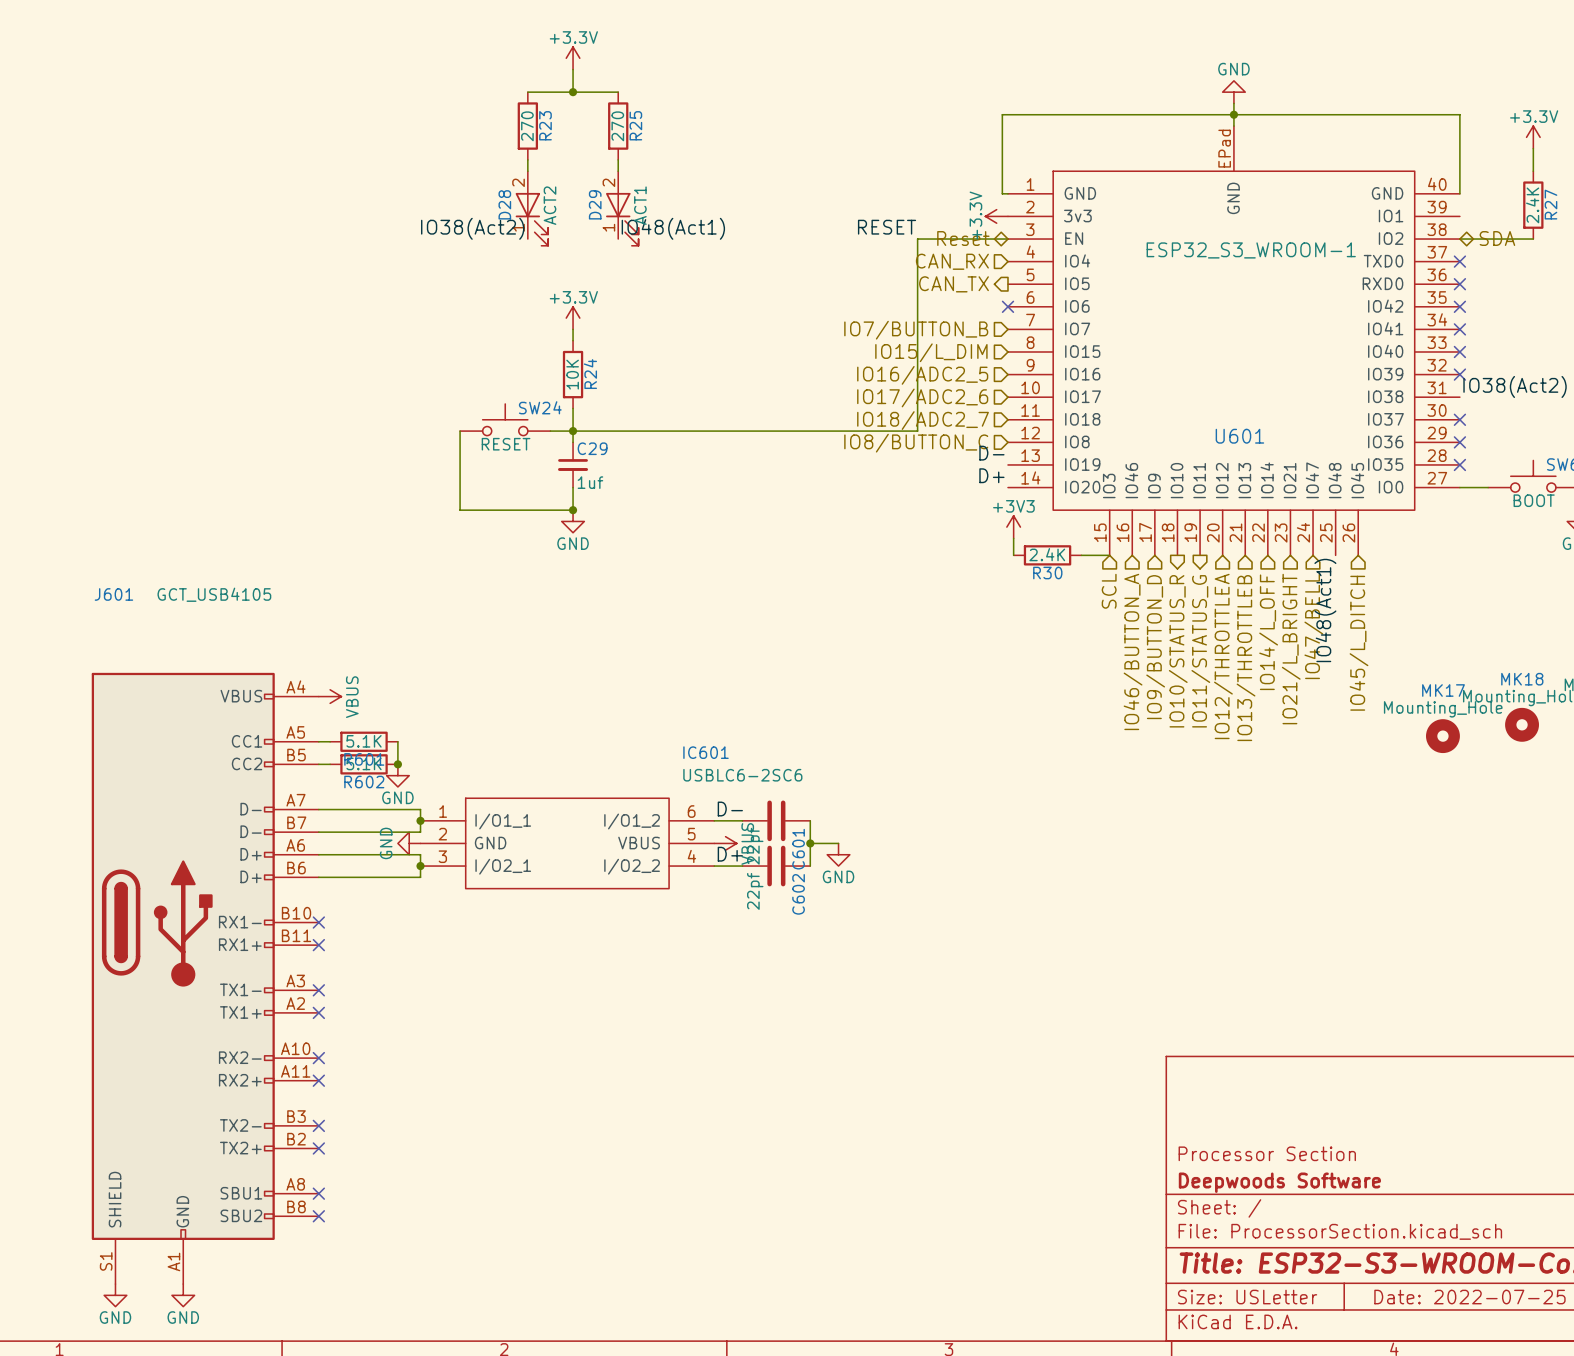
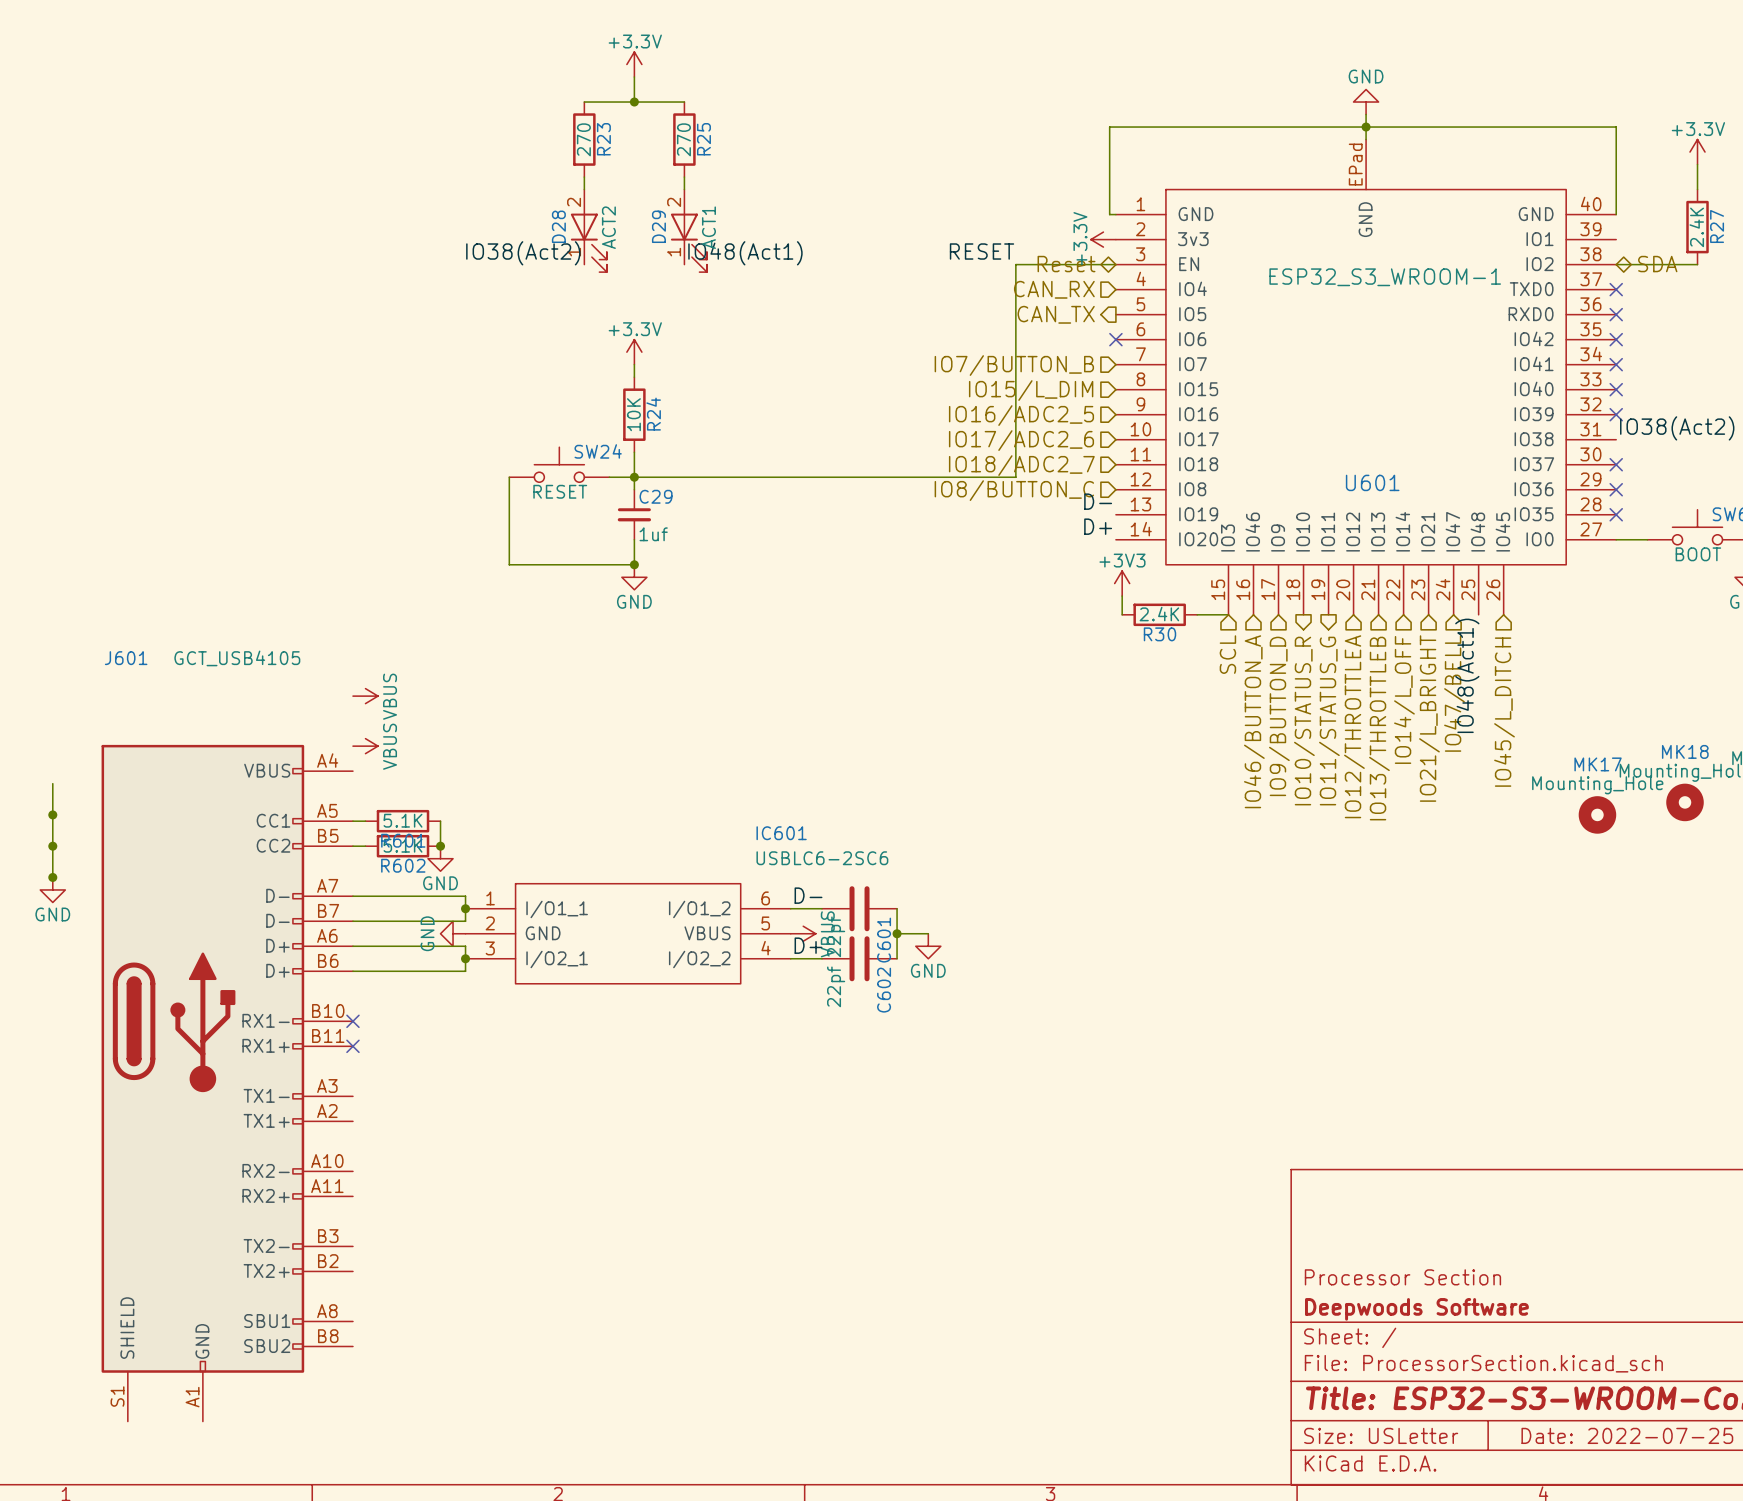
power symbol: none -> VBUS (365, 696)
power symbol position: VBUS (330, 696) -> VBUS (365, 746)
wire: none -> (52, 783) (52, 877)
junction: none -> (52, 814)
junction: none -> (52, 846)
junction: none -> (52, 877)
power symbol: none -> GND (52, 889)
no-connect mark: (318, 990) -> none
no-connect mark: (318, 1012) -> none
no-connect mark: (318, 1058) -> none
no-connect mark: (318, 1080) -> none
no-connect mark: (318, 1125) -> none
no-connect mark: (318, 1148) -> none
no-connect mark: (318, 1193) -> none
no-connect mark: (318, 1216) -> none
power symbol: GND (115, 1295) -> none
power symbol: GND (183, 1295) -> none

